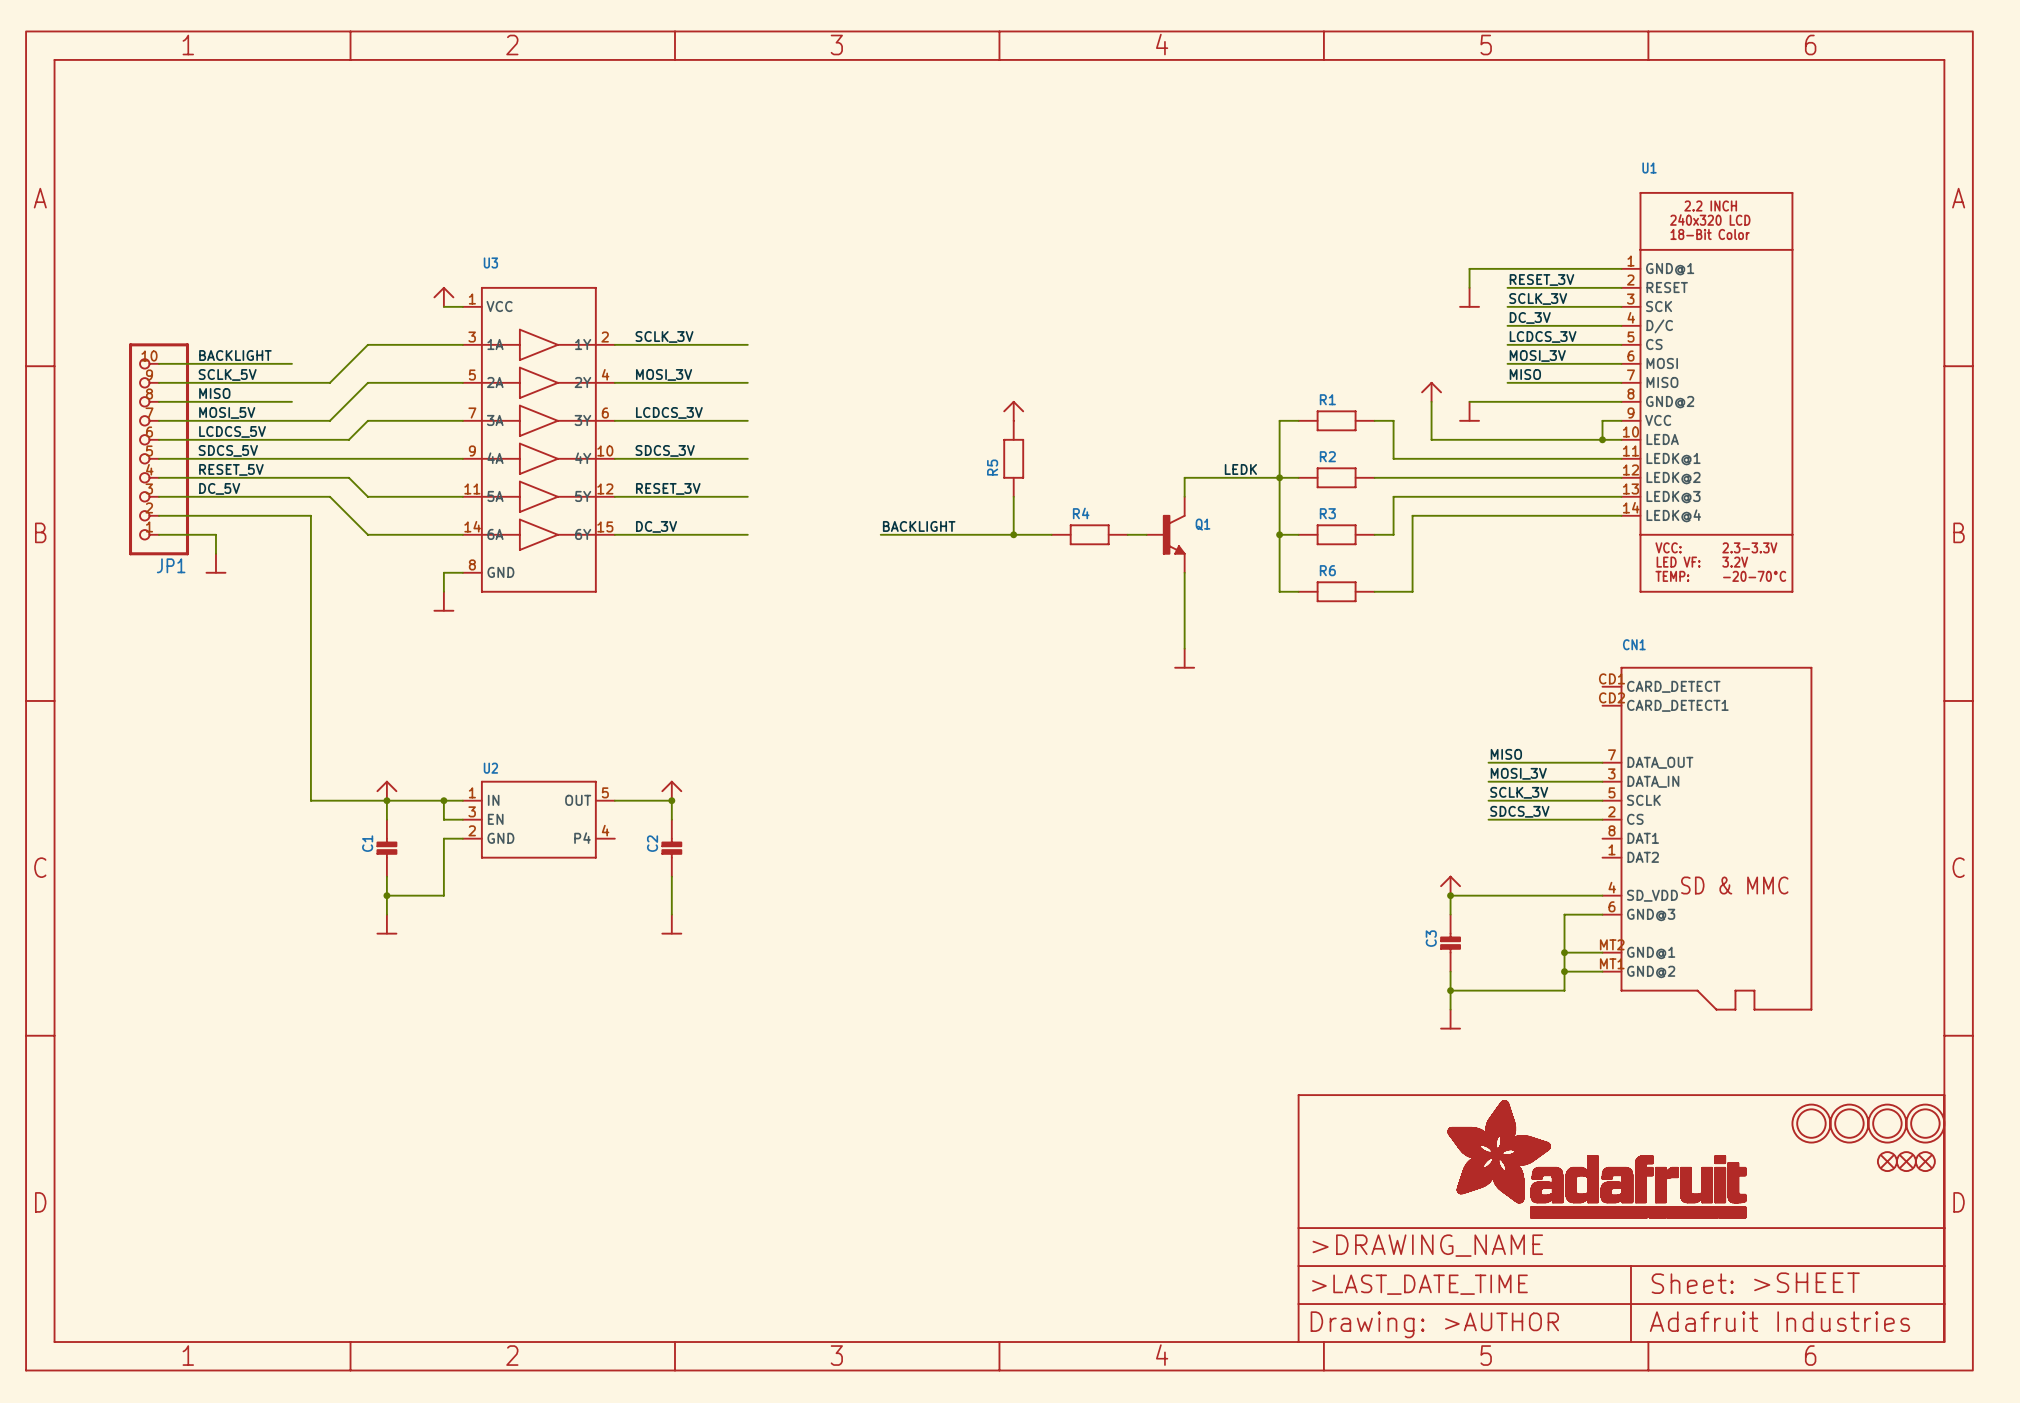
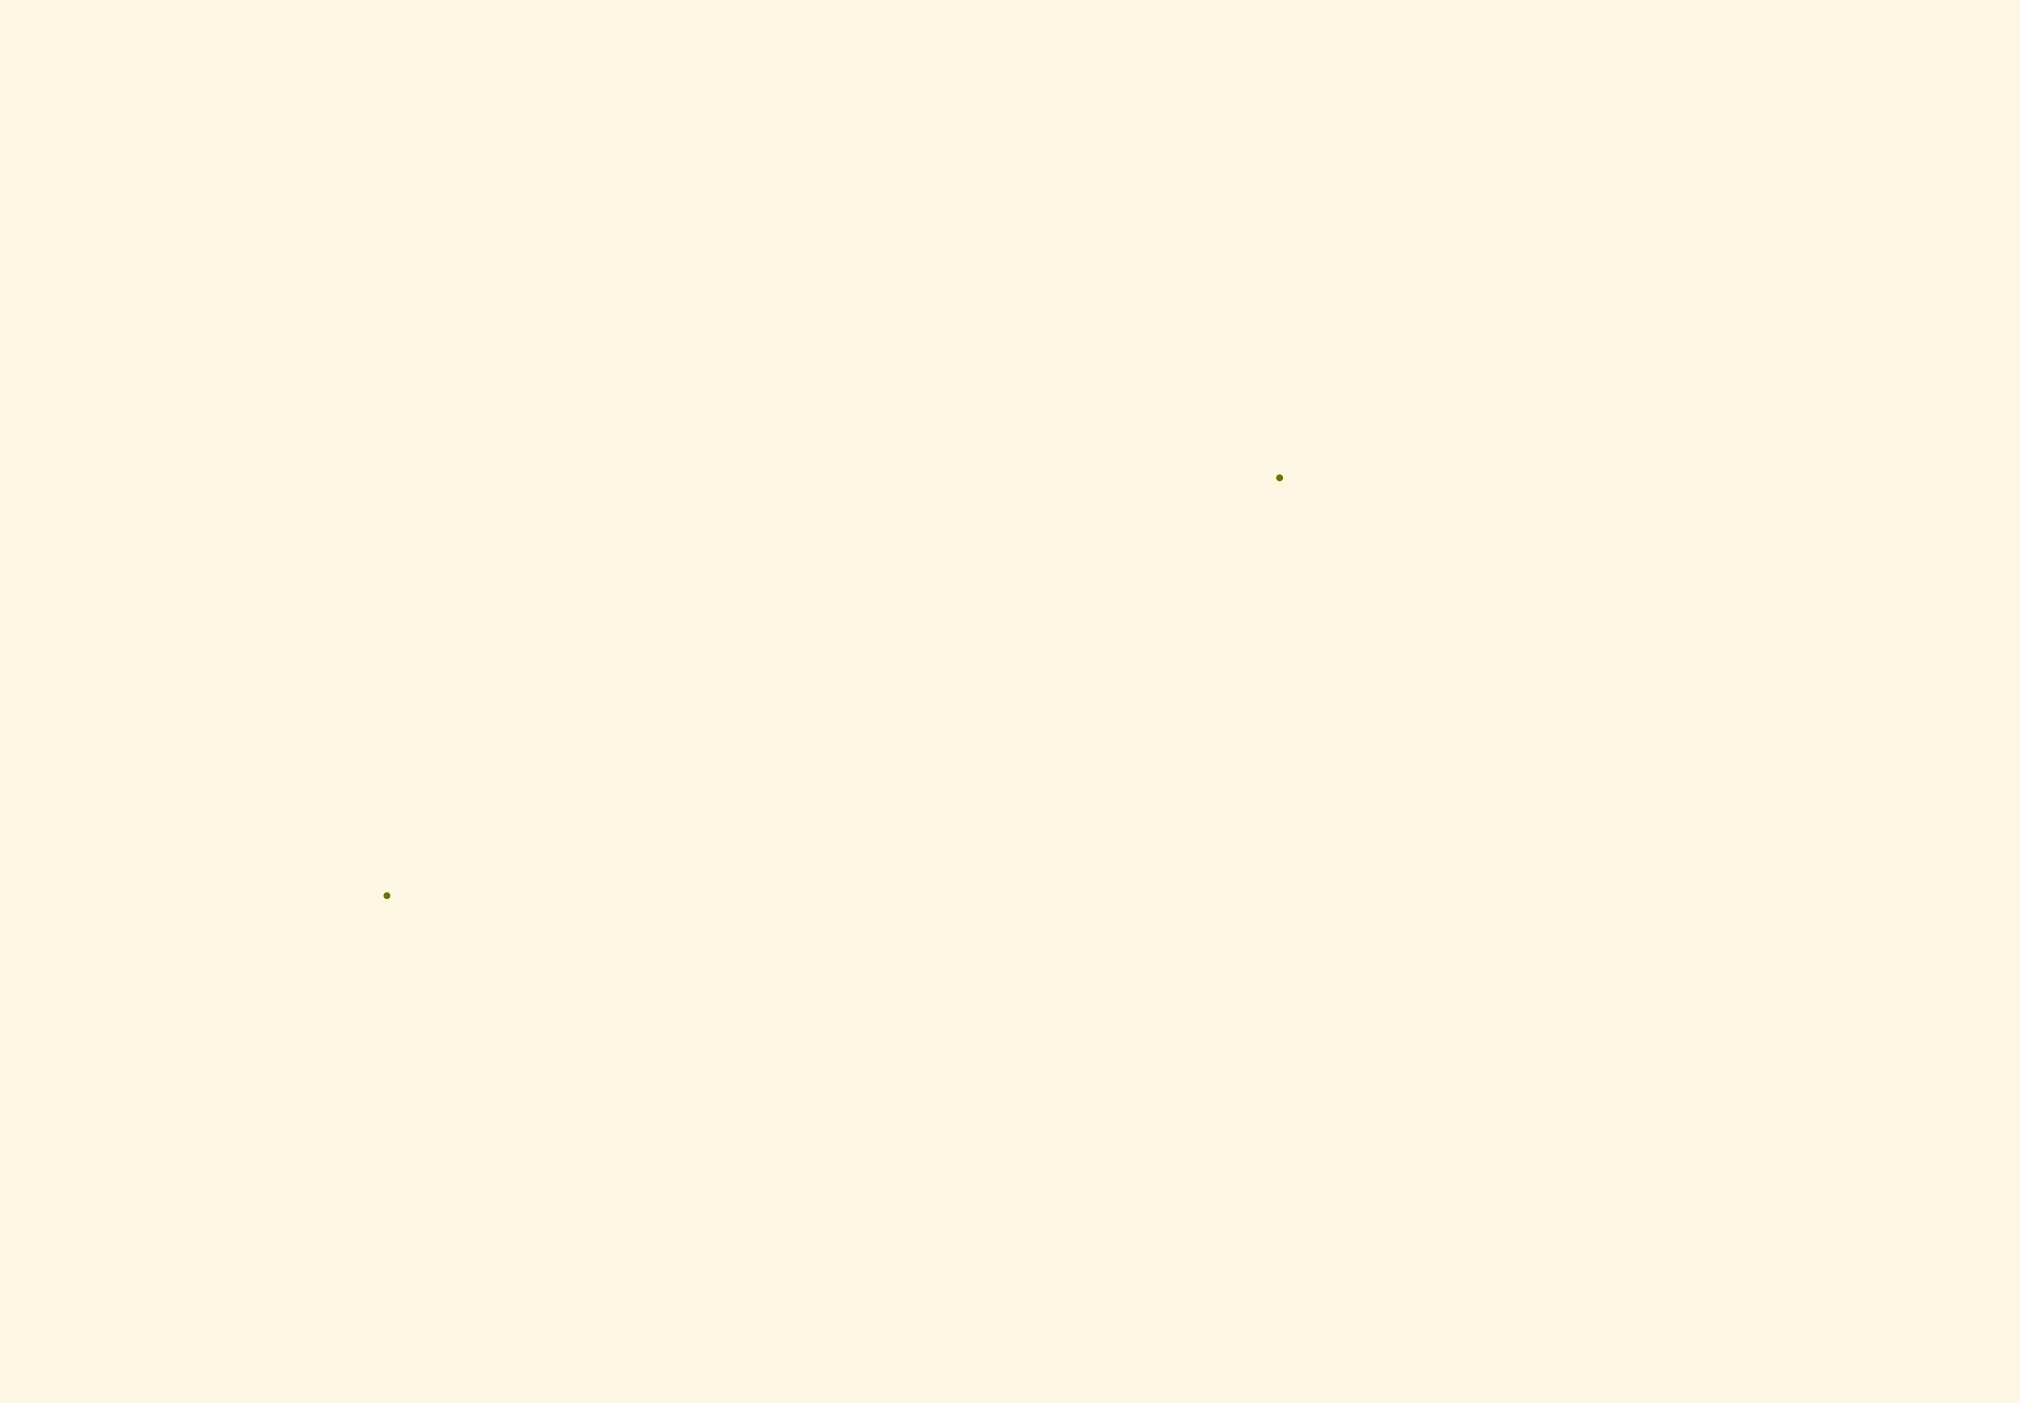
drawing: [26, 31, 1973, 1371] -> none
wire: (1621, 268) (1469, 268) (1469, 287) -> none
label: RESET_3V (1541, 279) -> none
wire: (1507, 287) (1621, 287) -> none
power symbol: (443, 296) -> none
power symbol: (1469, 297) -> none
label: SCLK_3V (1538, 298) -> none
wire: (443, 306) (462, 306) -> none
wire: (1507, 306) (1621, 306) -> none
label: DC_3V (1530, 317) -> none
wire: (1507, 325) (1621, 325) -> none
label: SCLK_3V (664, 336) -> none
label: LCDCS_3V (1543, 336) -> none
wire: (462, 344) (367, 344) (329, 382) (159, 382) -> none
wire: (614, 344) (747, 344) -> none
wire: (1507, 344) (1621, 344) -> none
label: BACKLIGHT (235, 355) -> none
label: MOSI_3V (1537, 355) -> none
wire: (159, 363) (291, 363) -> none
wire: (1507, 363) (1621, 363) -> none
label: SCLK_5V (227, 374) -> none
label: MOSI_3V (664, 374) -> none
label: MISO (1525, 374) -> none
wire: (462, 382) (367, 382) (329, 420) (159, 420) -> none
wire: (614, 382) (747, 382) -> none
wire: (1507, 382) (1621, 382) -> none
power symbol: (1431, 391) -> none
U1: (1707, 392) -> none
label: MISO (214, 393) -> none
wire: (159, 401) (291, 401) -> none
wire: (1431, 401) (1431, 439) (1621, 439) -> none
wire: (1469, 401) (1621, 401) -> none
power symbol: (1013, 410) -> none
power symbol: (1469, 411) -> none
label: MOSI_5V (227, 412) -> none
label: LCDCS_3V (669, 412) -> none
wire: (462, 420) (367, 420) (348, 439) (159, 439) -> none
wire: (614, 420) (747, 420) -> none
wire: (1298, 420) (1279, 420) (1279, 591) (1298, 591) -> none
R1: (1336, 420) -> none
wire: (1374, 420) (1393, 420) (1393, 458) (1621, 458) -> none
wire: (1621, 420) (1602, 420) (1602, 439) -> none
label: LCDCS_5V (232, 431) -> none
U3: (538, 439) -> none
junction: (1602, 439) -> none
JP1: (159, 449) -> none
label: SDCS_5V (228, 450) -> none
label: SDCS_3V (665, 450) -> none
wire: (159, 458) (462, 458) -> none
wire: (614, 458) (747, 458) -> none
R5: (1013, 458) -> none
label: RESET_5V (231, 469) -> none
label: LEDK (1240, 469) -> none
wire: (159, 477) (348, 477) (367, 496) (462, 496) -> none
wire: (1298, 477) (1184, 477) (1184, 496) -> none
R2: (1336, 477) -> none
wire: (1374, 477) (1621, 477) -> none
label: DC_5V (219, 488) -> none
label: RESET_3V (668, 488) -> none
wire: (159, 496) (329, 496) (367, 534) (462, 534) -> none
wire: (614, 496) (747, 496) -> none
wire: (1013, 496) (1013, 534) -> none
wire: (1621, 496) (1393, 496) (1393, 534) (1374, 534) -> none
wire: (159, 515) (310, 515) (310, 800) (462, 800) -> none
wire: (1621, 515) (1412, 515) (1412, 591) (1374, 591) -> none
label: DC_3V (656, 526) -> none
label: BACKLIGHT (919, 526) -> none
wire: (159, 534) (215, 534) (215, 553) -> none
wire: (614, 534) (747, 534) -> none
wire: (880, 534) (1051, 534) -> none
junction: (1013, 534) -> none
R4: (1089, 534) -> none
wire: (1127, 534) (1146, 534) -> none
Q1: (1165, 534) -> none
wire: (1279, 534) (1298, 534) -> none
junction: (1279, 534) -> none
R3: (1336, 534) -> none
power symbol: (215, 563) -> none
wire: (462, 572) (443, 572) (443, 591) -> none
wire: (1184, 572) (1184, 648) -> none
R6: (1336, 591) -> none
power symbol: (443, 601) -> none
power symbol: (1184, 658) -> none
label: MISO (1506, 754) -> none
wire: (1488, 762) (1602, 762) -> none
label: MOSI_3V (1518, 773) -> none
wire: (1488, 781) (1602, 781) -> none
power symbol: (386, 790) -> none
power symbol: (671, 790) -> none
label: SCLK_3V (1519, 792) -> none
wire: (386, 800) (386, 819) -> none
junction: (386, 800) -> none
wire: (443, 800) (443, 819) (462, 819) -> none
junction: (443, 800) -> none
wire: (614, 800) (671, 800) (671, 819) -> none
junction: (671, 800) -> none
wire: (1488, 800) (1602, 800) -> none
label: SDCS_3V (1519, 811) -> none
U2: (538, 819) -> none
wire: (1488, 819) (1602, 819) -> none
wire: (462, 838) (443, 838) (443, 895) (386, 895) -> none
CN1: (1707, 838) -> none
C1: (386, 848) -> none
C2: (671, 848) -> none
wire: (386, 876) (386, 914) -> none
wire: (671, 876) (671, 914) -> none
power symbol: (1450, 885) -> none
junction: (1450, 895) -> none
wire: (1602, 895) (1450, 895) (1450, 914) -> none
wire: (1602, 914) (1564, 914) (1564, 990) (1450, 990) -> none
power symbol: (386, 924) -> none
power symbol: (671, 924) -> none
C3: (1450, 943) -> none
wire: (1564, 952) (1602, 952) -> none
junction: (1564, 952) -> none
wire: (1450, 971) (1450, 1009) -> none
wire: (1564, 971) (1602, 971) -> none
junction: (1564, 971) -> none
junction: (1450, 990) -> none
power symbol: (1450, 1019) -> none
part: (1811, 1123) -> none
part: (1849, 1123) -> none
part: (1887, 1123) -> none
part: (1925, 1123) -> none
part: (1887, 1161) -> none
part: (1906, 1161) -> none
part: (1925, 1161) -> none

